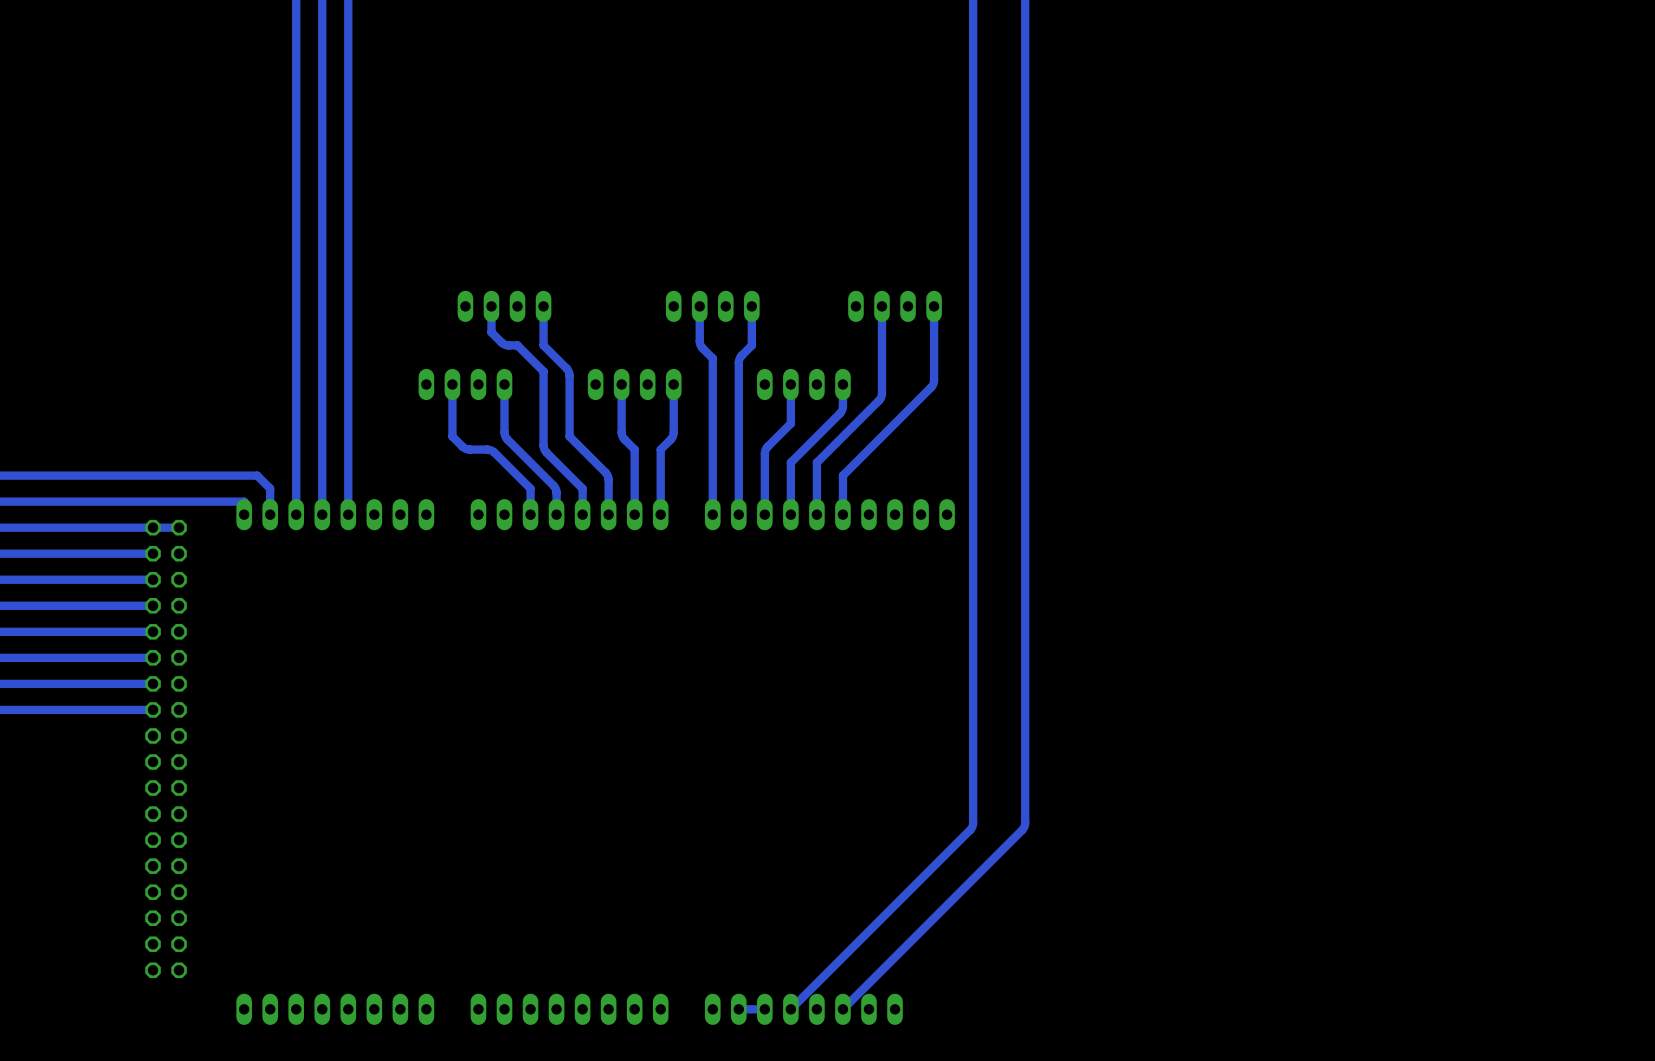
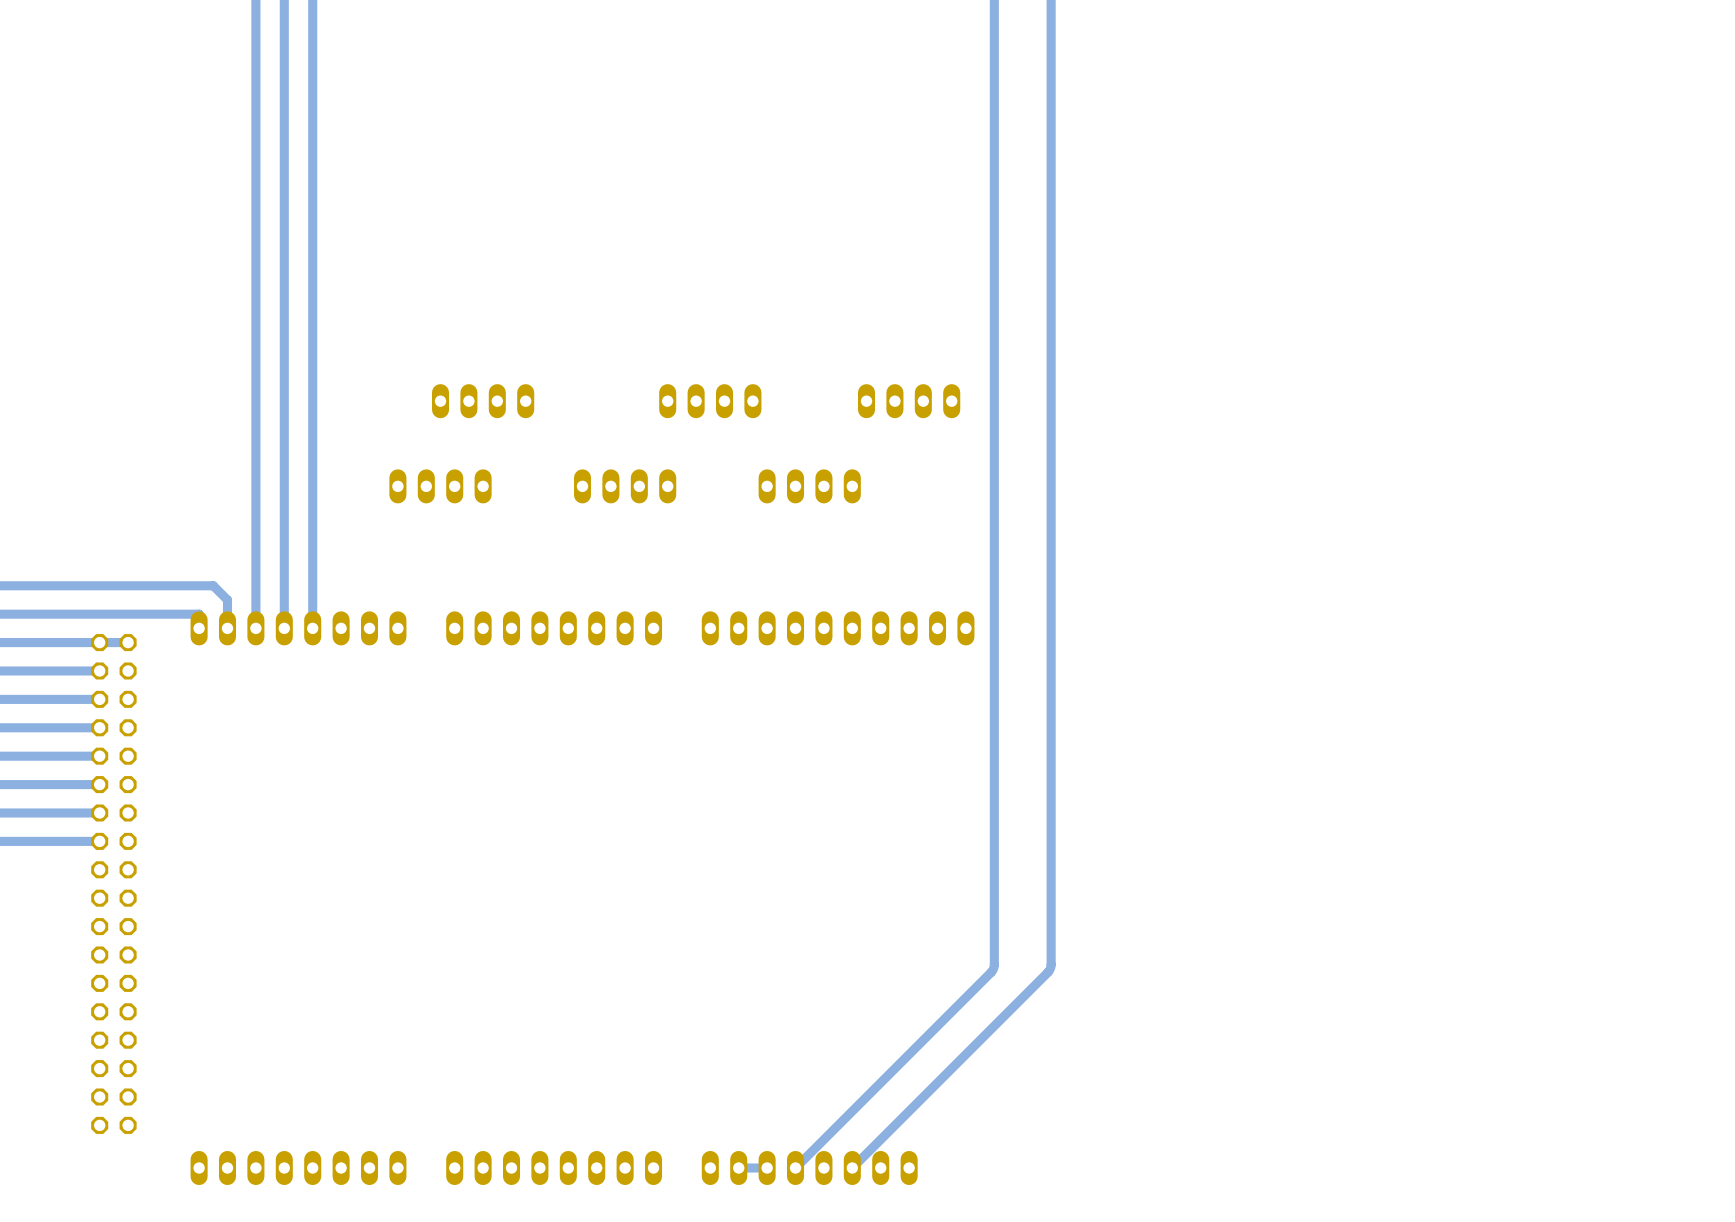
track: (491, 306) (491, 332) (503, 344) (517, 345) (543, 371) (543, 447) (582, 488) (582, 514) -> none
track: (543, 306) (543, 345) (569, 373) (569, 436) (607, 474) (608, 514) -> none
track: (699, 306) (700, 343) (712, 358) (712, 514) -> none
track: (751, 306) (751, 345) (740, 356) (738, 362) (738, 514) -> none
track: (882, 306) (881, 395) (816, 462) (816, 514) -> none
track: (934, 306) (933, 384) (842, 475) (842, 514) -> none
track: (452, 384) (452, 436) (465, 448) (492, 450) (530, 488) (530, 514) -> none
track: (504, 384) (505, 436) (555, 487) (556, 514) -> none
track: (621, 384) (622, 434) (634, 449) (634, 514) -> none
track: (673, 384) (673, 434) (660, 449) (660, 514) -> none
track: (790, 384) (790, 423) (765, 451) (764, 514) -> none
track: (842, 384) (841, 411) (790, 462) (790, 514) -> none

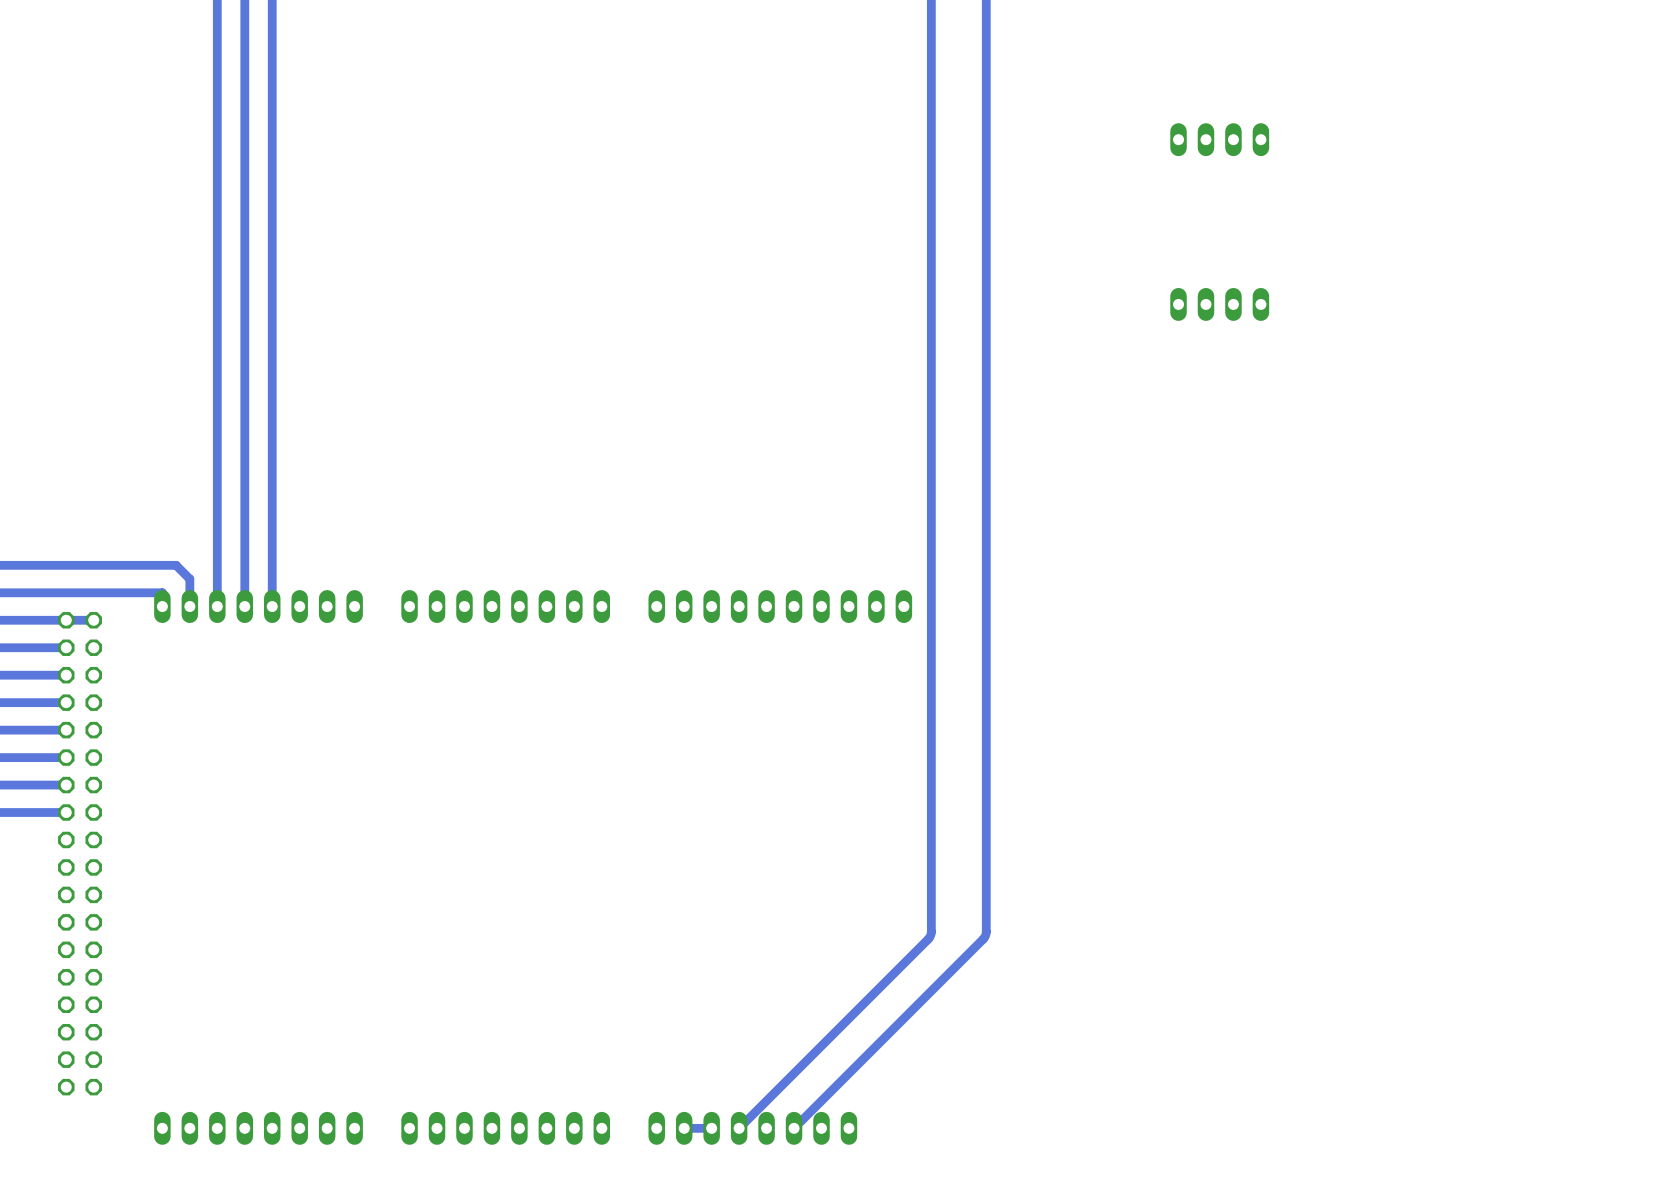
part: none -> (1219, 139)
part: none -> (1219, 304)
part: (483, 401) -> none
part: (710, 401) -> none
part: (909, 401) -> none
part: (440, 486) -> none
part: (625, 486) -> none
part: (809, 486) -> none

